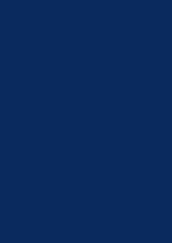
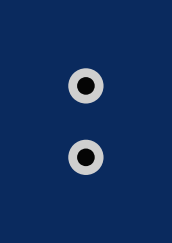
part: none -> (85, 85)
part: none -> (85, 157)

